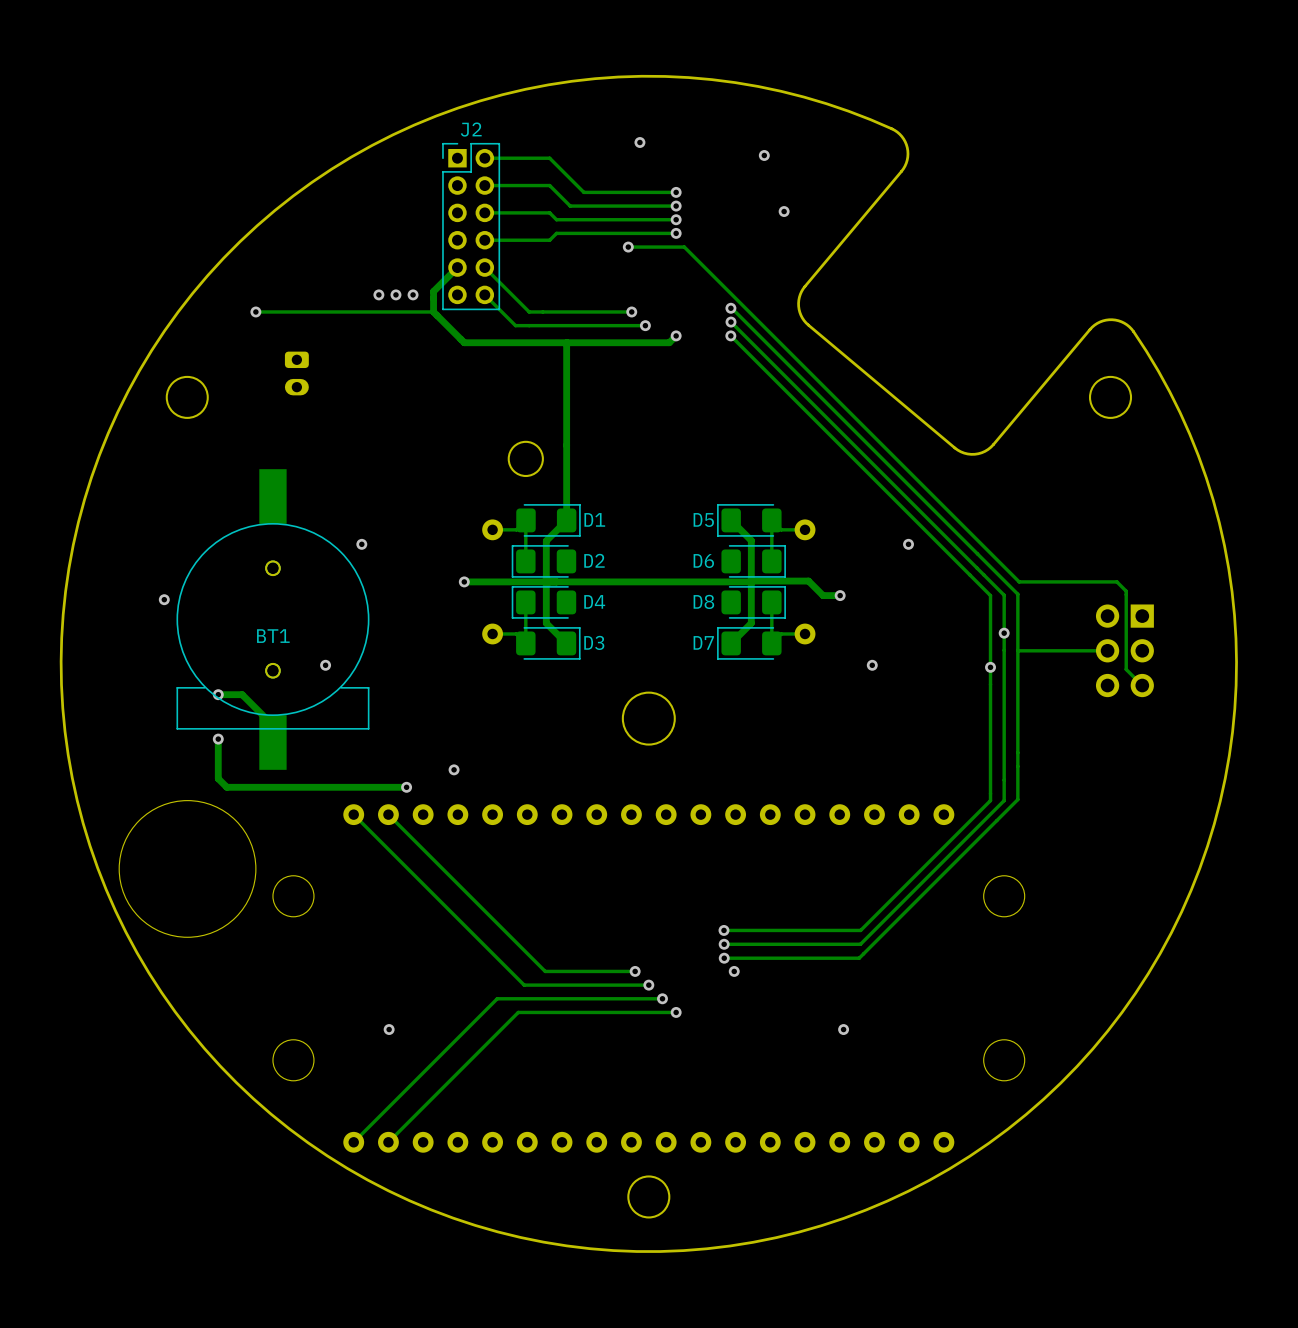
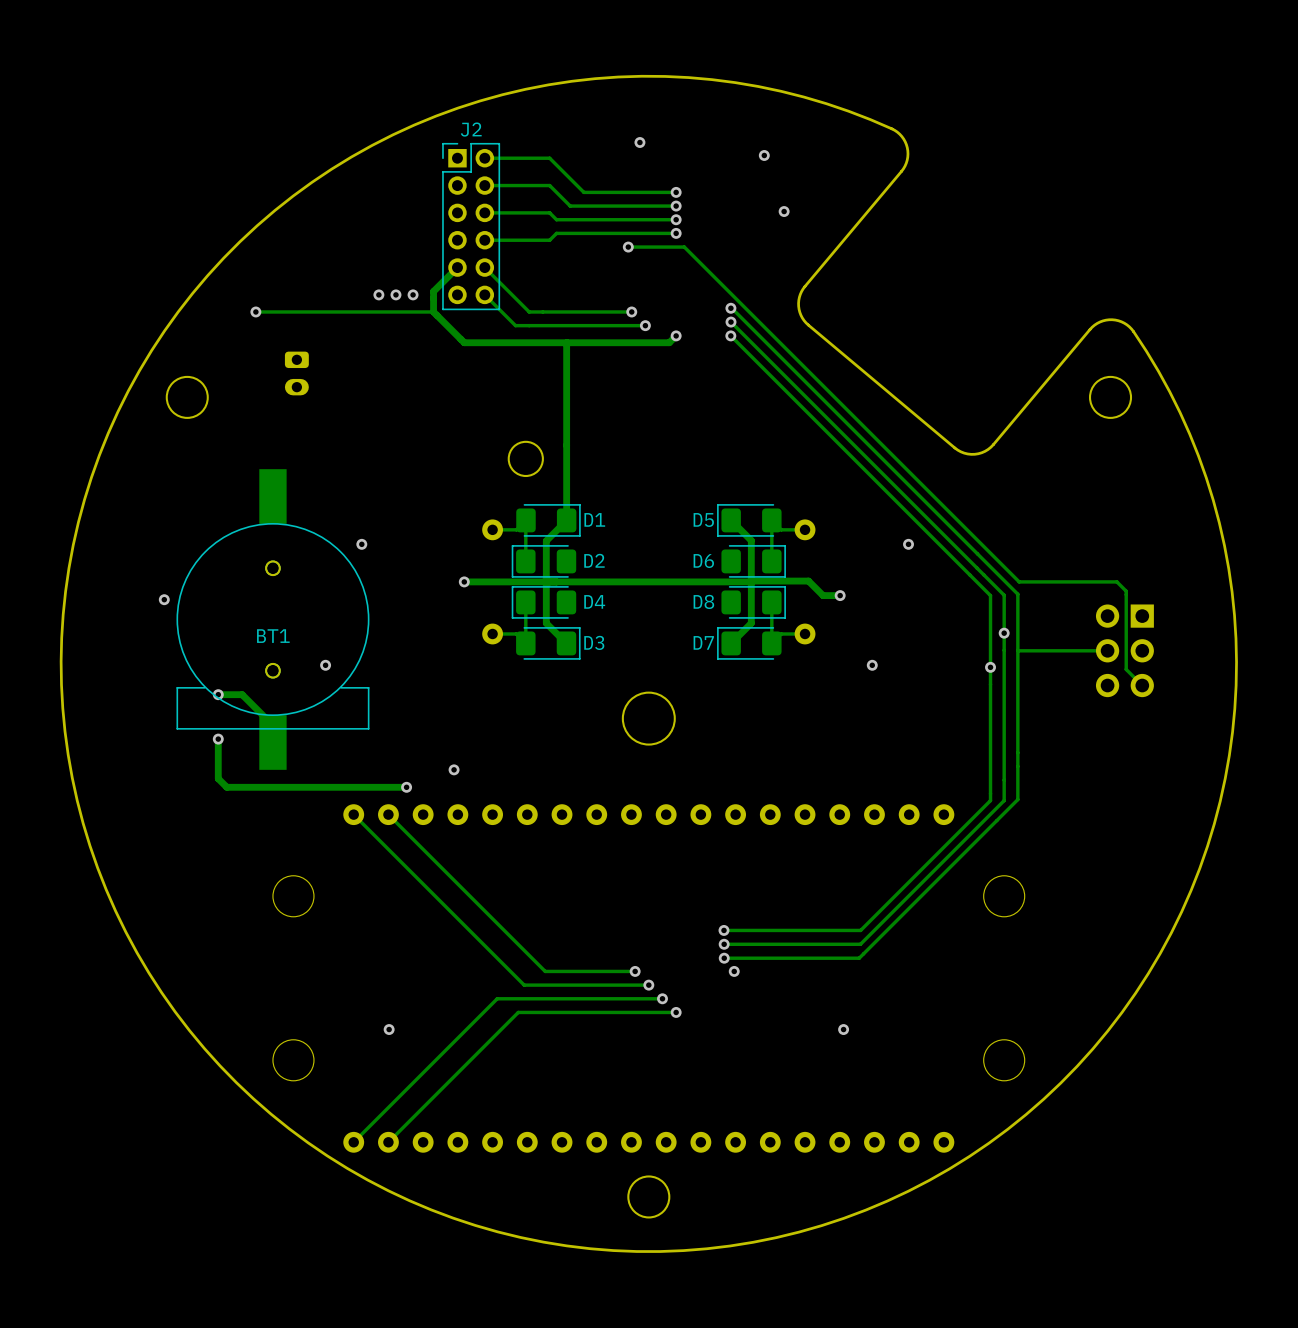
round board edge: [118, 800, 257, 938] -> none

